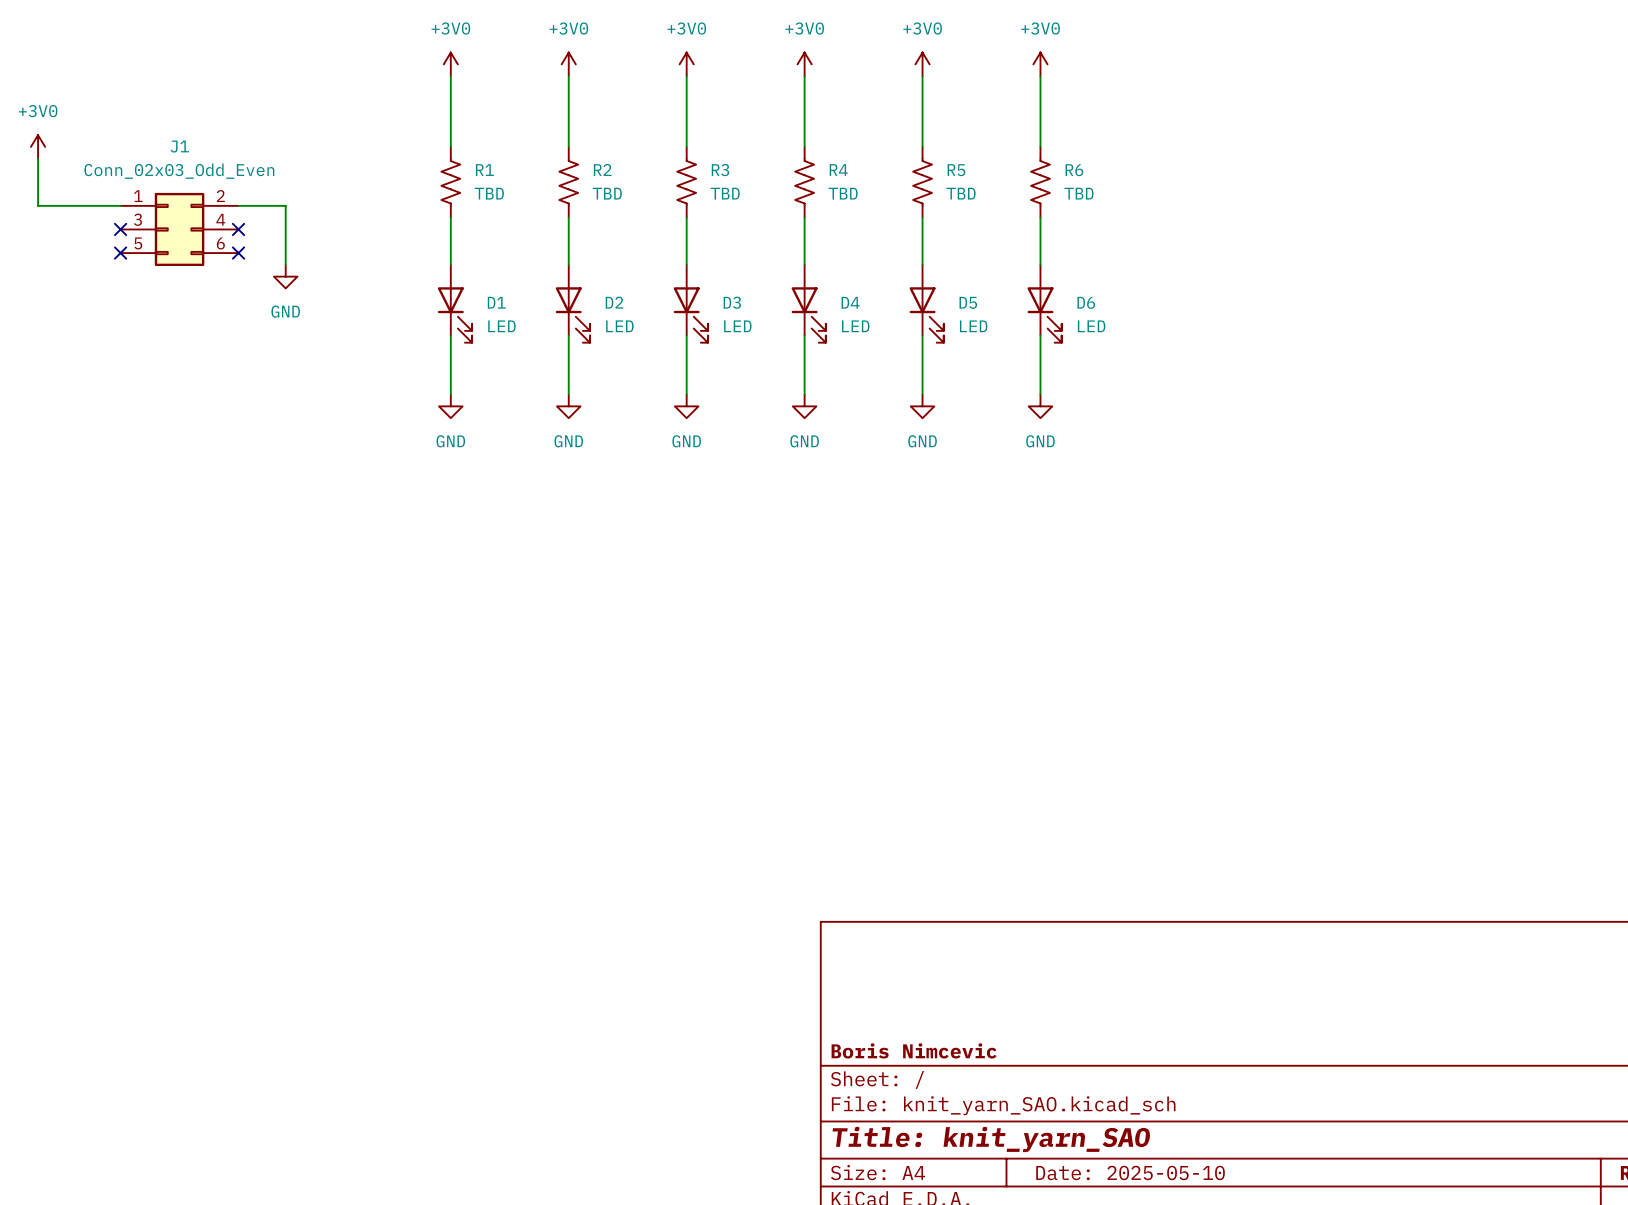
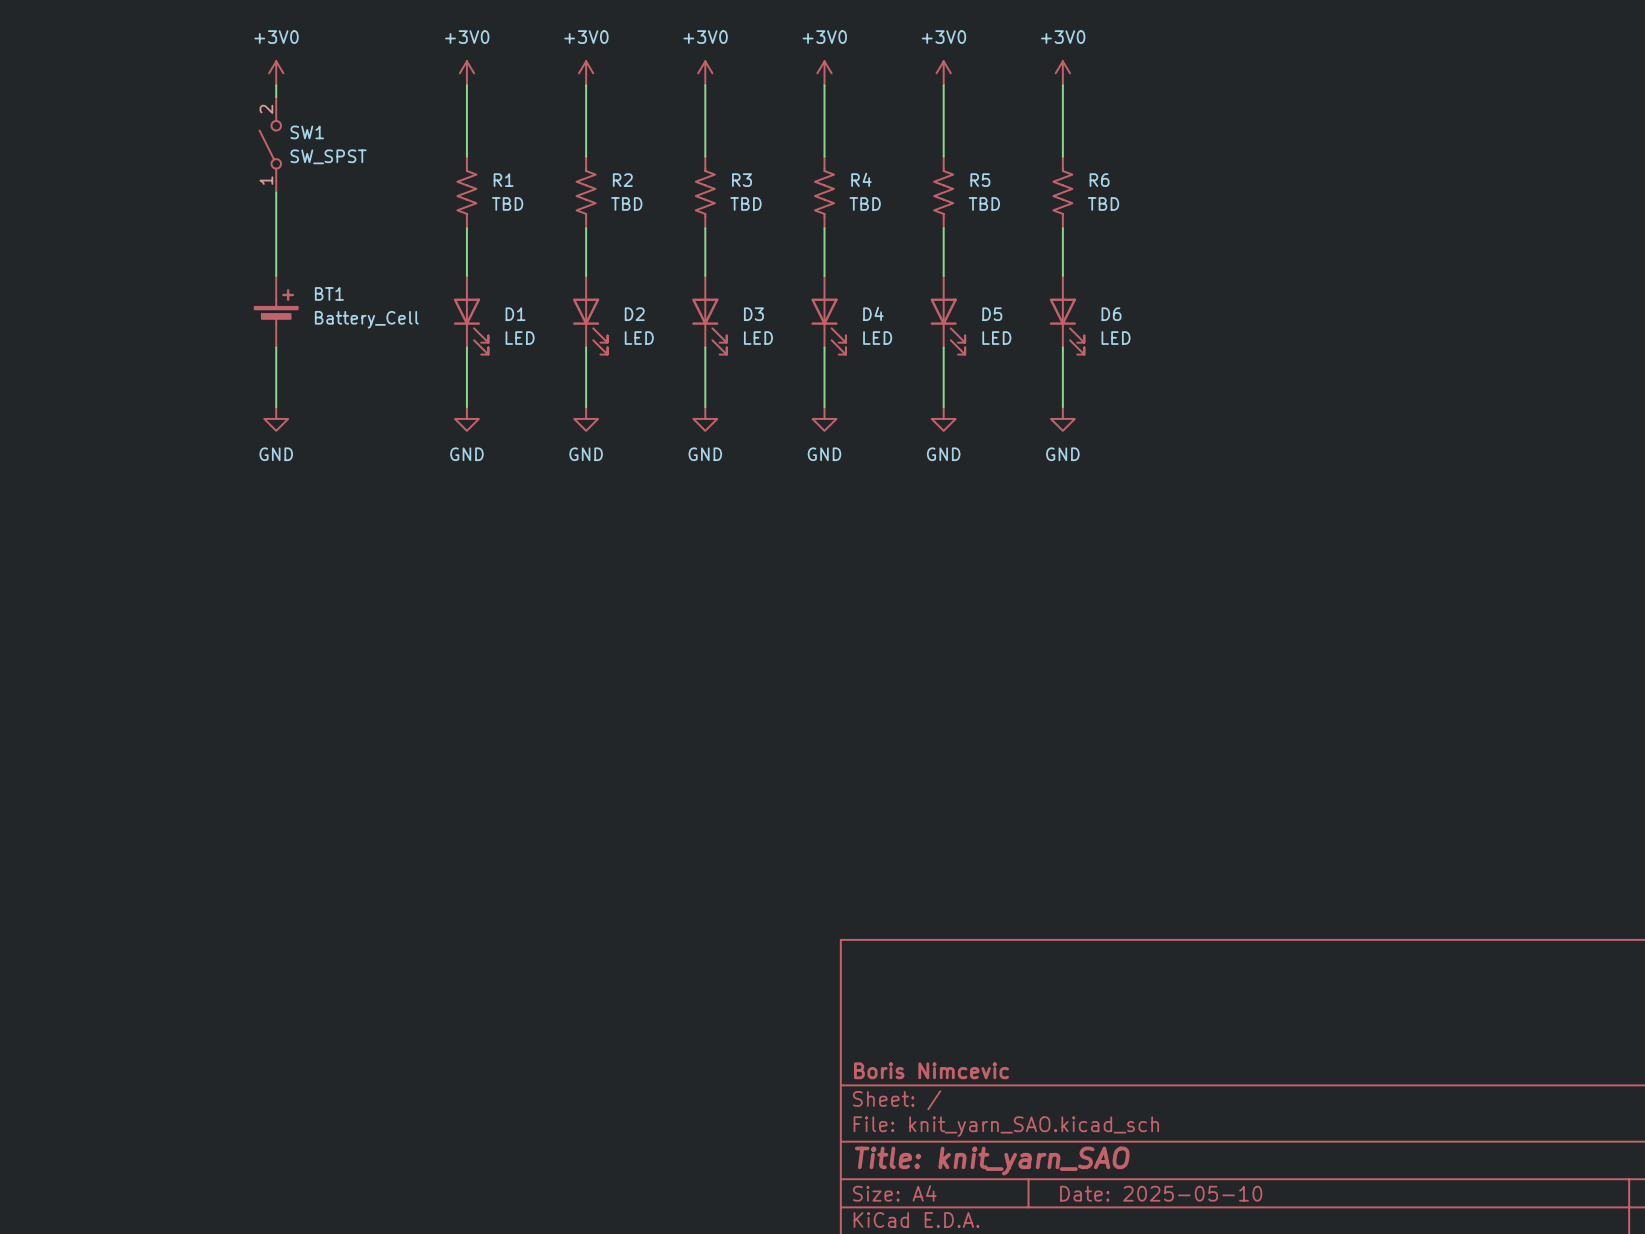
power symbol: none -> +3V0 (276, 73)
wire: none -> (276, 85) (276, 97)
SW1: none -> SW_SPST (270, 144)
power symbol: +3V0 (38, 146) -> none
wire: (38, 158) (38, 205) (120, 205) -> none
wire: none -> (276, 192) (276, 275)
wire: (238, 205) (285, 205) (285, 264) -> none
no-connect mark: (120, 229) -> none
J1: Conn_02x03_Odd_Even (179, 229) -> none
no-connect mark: (238, 229) -> none
no-connect mark: (120, 253) -> none
no-connect mark: (238, 253) -> none
power symbol position: GND (285, 276) -> GND (276, 418)
BT1: none -> Battery_Cell (276, 311)
wire: none -> (276, 347) (276, 407)

